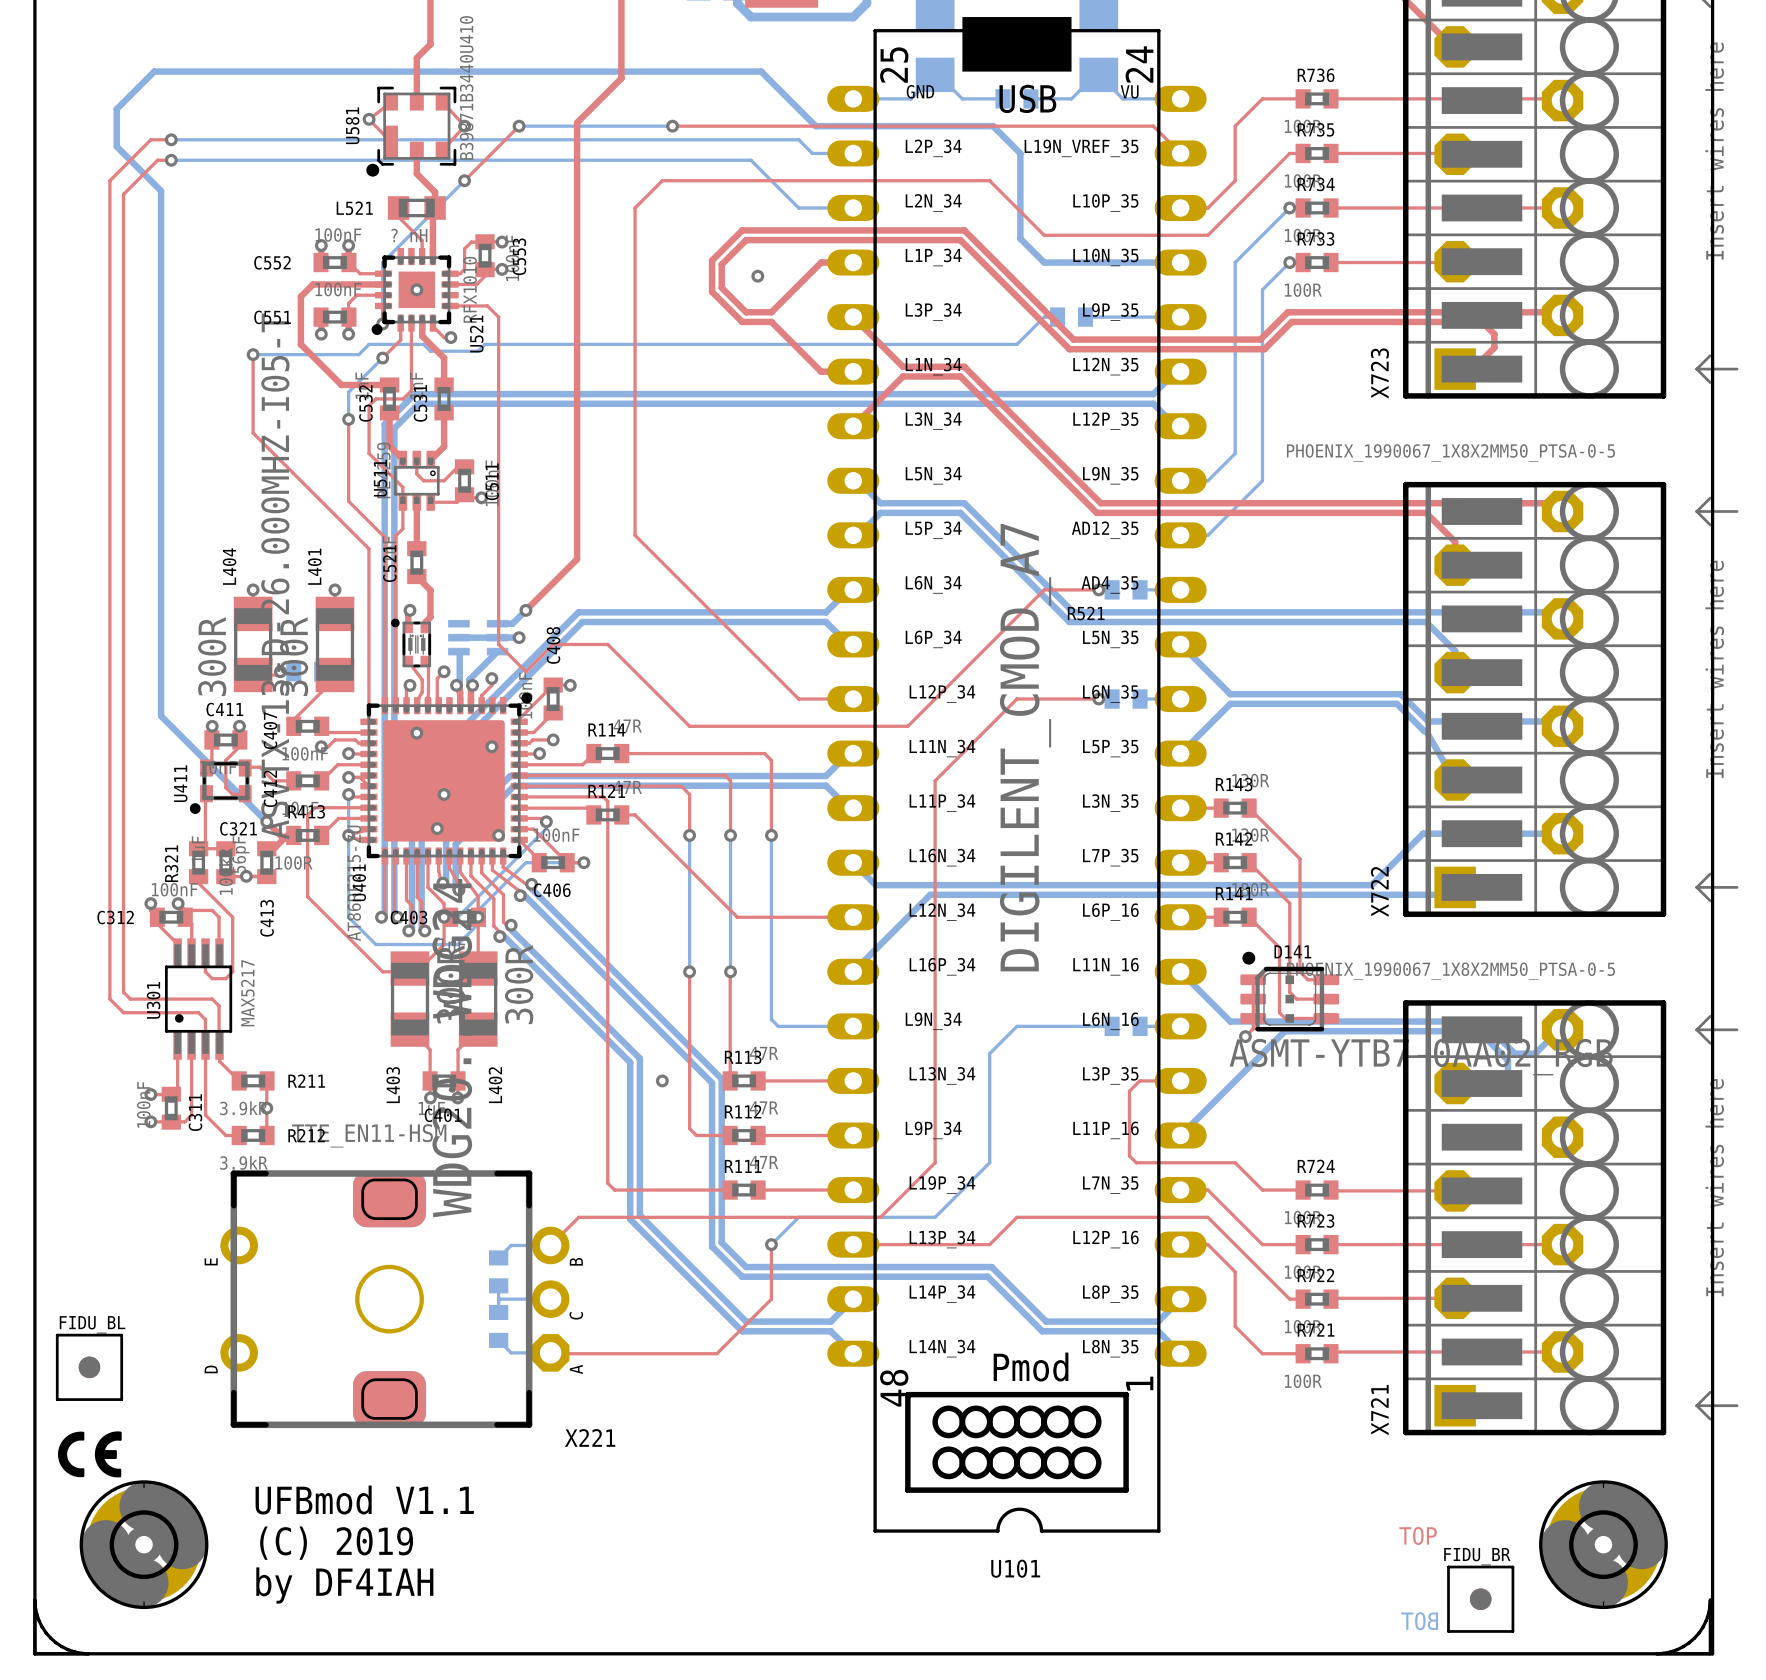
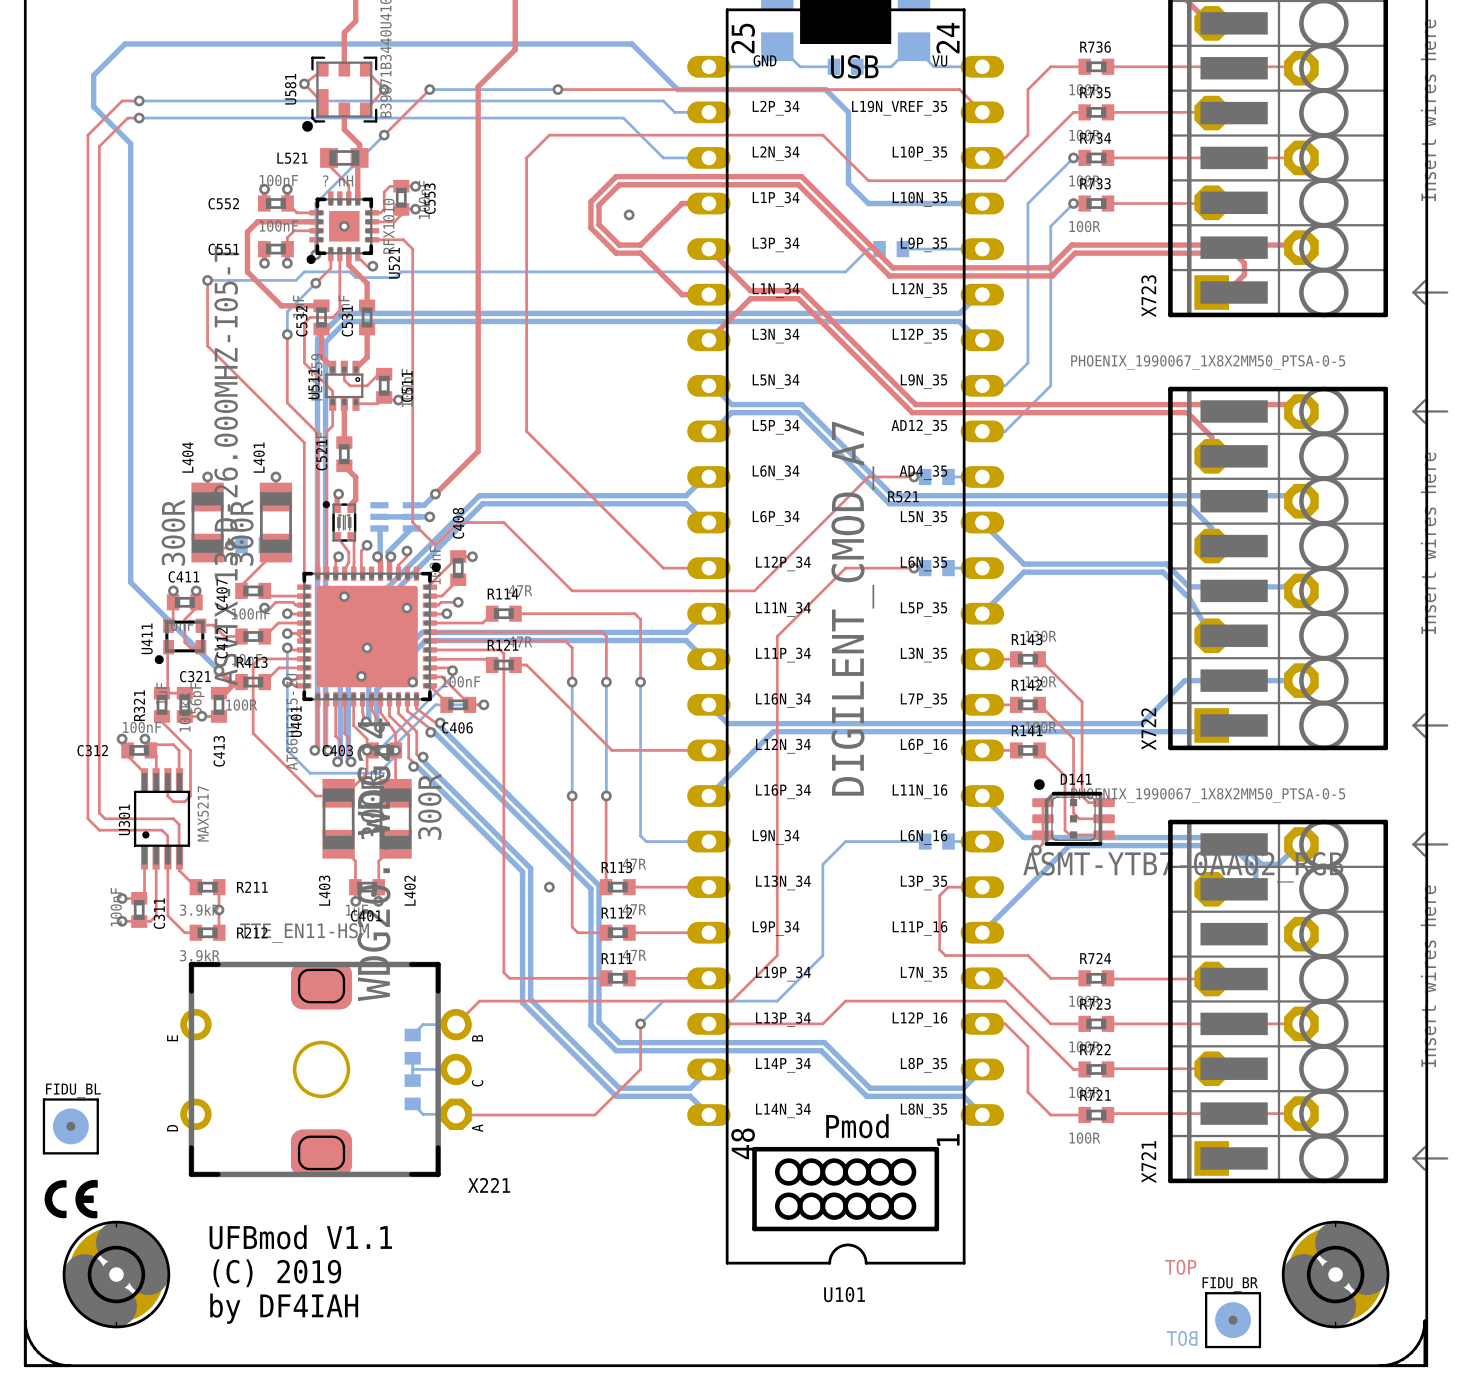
FIDU_BL footprint: [55, 1333, 124, 1401] -> [42, 1098, 99, 1155]
FIDU_BR footprint: [1447, 1565, 1515, 1633] -> [1204, 1292, 1262, 1349]

